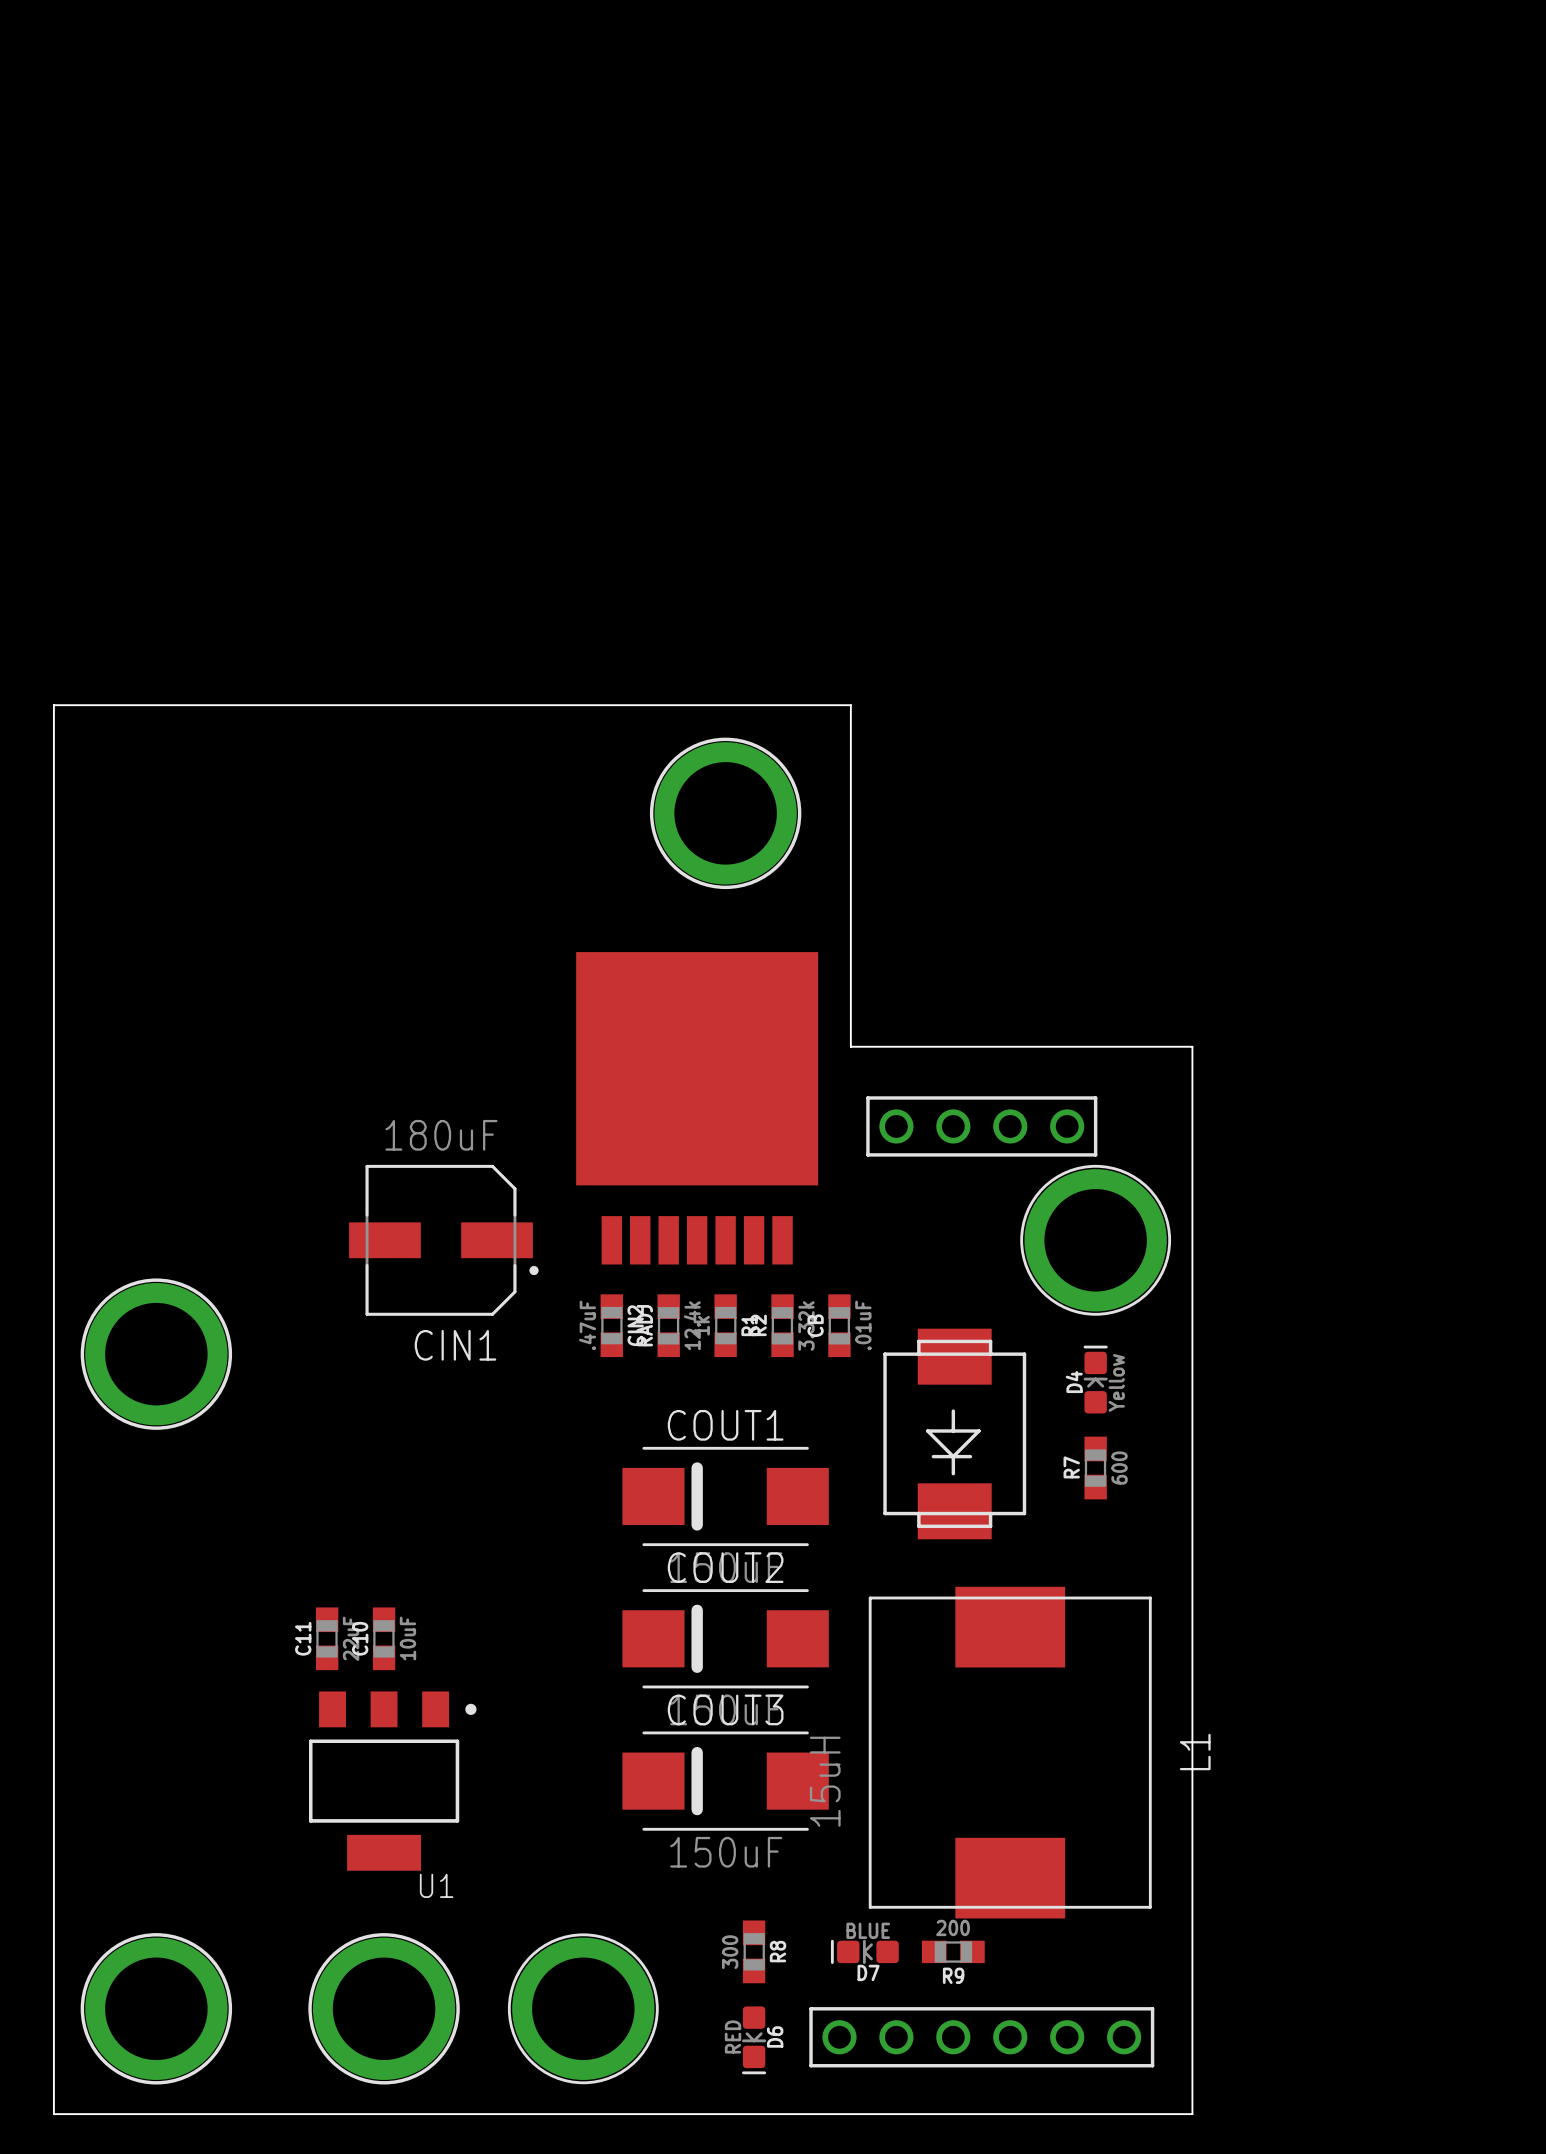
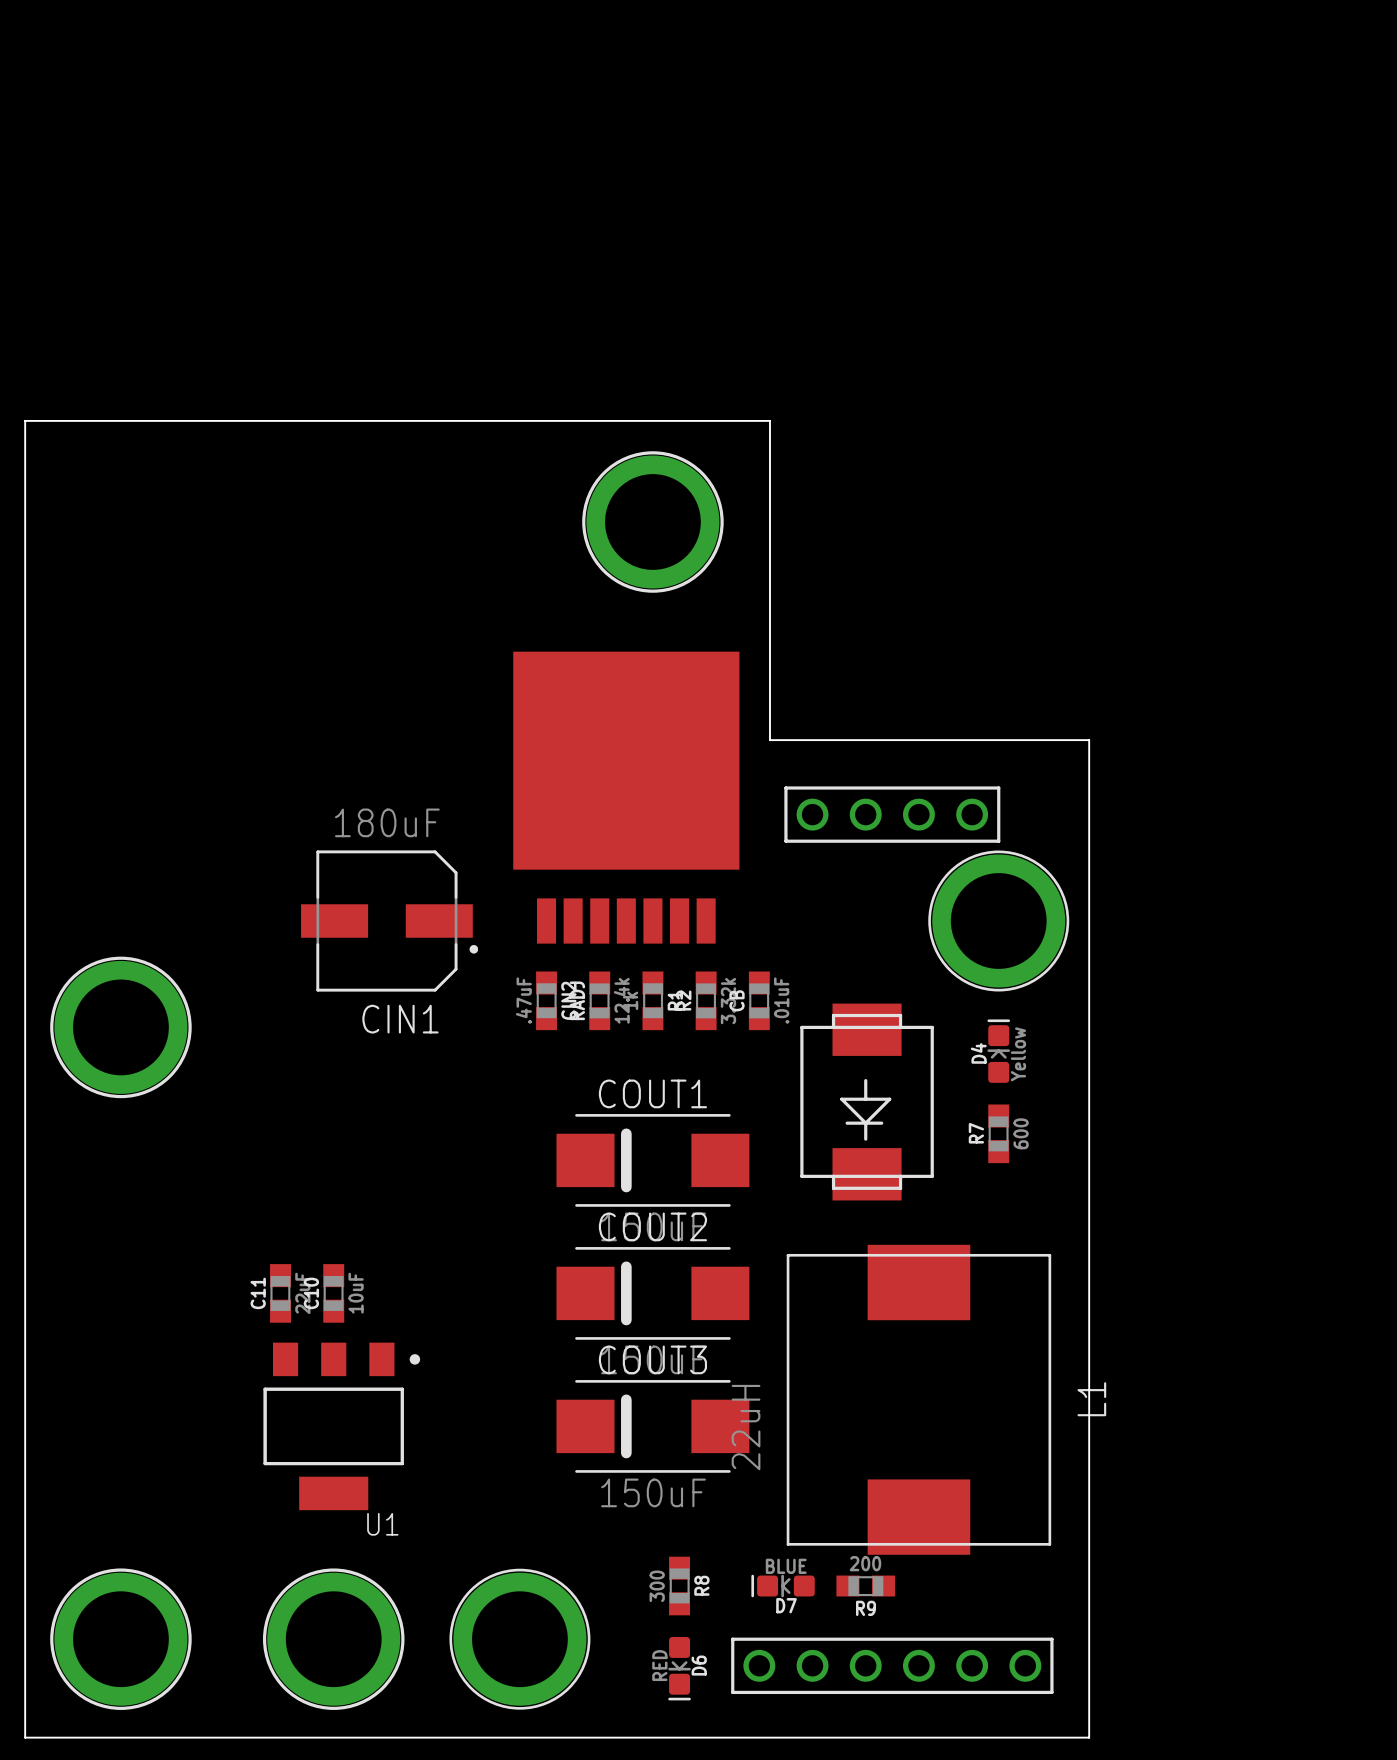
L1 value: 15uH (825, 1781) -> 22uH (746, 1427)

